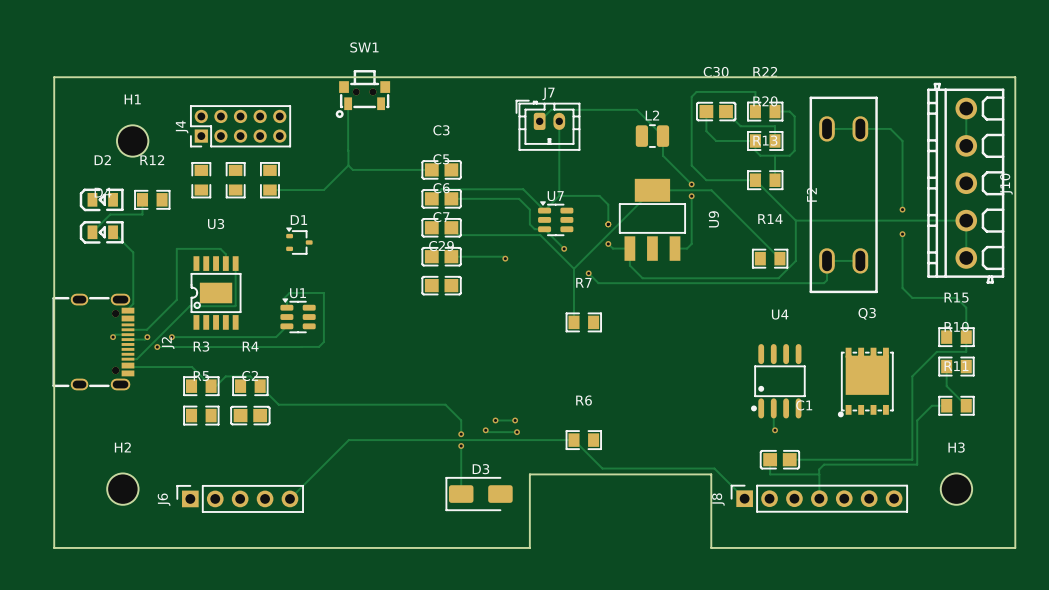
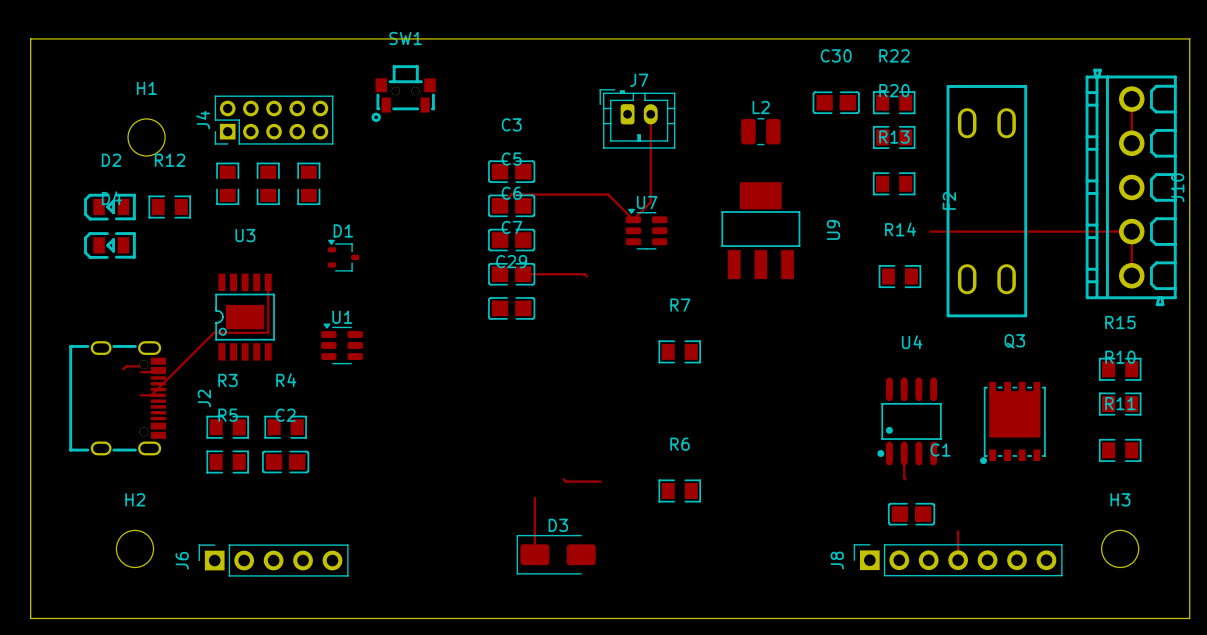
board edge: (1015, 77) (54, 77) (54, 547) -> (1189, 62) (1189, 38) (30, 38) (30, 618) (53, 618)
SW1 position: (362, 94) -> (403, 93)
track: (348, 103) (348, 165) -> none
track: (706, 111) (706, 131) (716, 140) (755, 140) (755, 150) (760, 155) (789, 155) (794, 150) (794, 116) (789, 111) (775, 111) -> none
track: (726, 111) (740, 126) (775, 126) (775, 140) -> none
track: (755, 111) (755, 91) (696, 91) (691, 96) (691, 165) (706, 180) (755, 180) (795, 220) (795, 260) (778, 278) (642, 278) (629, 265) (629, 248) (612, 248) (608, 243) -> none
track: (539, 121) (551, 109) (636, 109) (662, 136) (662, 155) (691, 184) -> none
track: (827, 128) (890, 128) (902, 140) (902, 209) -> none
track: (775, 155) (775, 180) -> none
track: (348, 165) (352, 169) (431, 169) -> none
track: (348, 165) (323, 190) (269, 190) -> none
via: (691, 184) -> none
track: (559, 195) (599, 195) (608, 204) (608, 224) -> none
track: (691, 196) (691, 243) (687, 248) (675, 248) -> none
via: (691, 196) -> none
track: (451, 198) (519, 198) (529, 209) (529, 224) (534, 229) (544, 229) (564, 248) -> none
track: (142, 199) (142, 214) (110, 214) (92, 232) -> none
via: (902, 209) -> none
via: (608, 224) -> none
track: (451, 227) (458, 235) (540, 235) (573, 268) -> none
track: (113, 232) (133, 252) (133, 303) (127, 309) -> none
track: (902, 234) (902, 288) (912, 297) (956, 297) (966, 307) (966, 351) (936, 351) (912, 376) (912, 459) (789, 459) -> none
via: (902, 234) -> none
via: (608, 243) -> none
via: (564, 248) -> none
via: (505, 258) -> none
track: (779, 258) (711, 190) (652, 190) (573, 268) -> none
track: (860, 260) (827, 260) (827, 280) (824, 283) (598, 283) (588, 273) -> none
track: (225, 263) (225, 254) (220, 248) (176, 248) (176, 299) (146, 329) (127, 329) -> none
track: (573, 268) (573, 322) -> none
via: (588, 273) -> none
track: (286, 307) (286, 300) (284, 297) (289, 292) (323, 292) (323, 342) (319, 346) (301, 346) -> none
track: (286, 326) (276, 337) (171, 337) -> none
via: (113, 337) -> none
via: (147, 337) -> none
via: (171, 337) -> none
J2 position: (93, 342) -> (117, 398)
track: (157, 347) (301, 347) -> none
via: (157, 347) -> none
track: (946, 366) (946, 386) (966, 405) -> none
track: (127, 367) (192, 367) (211, 386) (216, 386) (225, 376) (250, 376) (278, 404) (445, 404) (461, 420) (461, 434) -> none
track: (946, 405) (931, 405) (917, 420) (917, 464) (824, 464) (819, 469) (819, 474) (770, 474) (770, 459) -> none
track: (495, 420) (515, 420) -> none
via: (495, 420) -> none
via: (515, 420) -> none
via: (485, 430) -> none
via: (775, 430) -> none
via: (517, 432) -> none
via: (461, 434) -> none
via: (461, 445) -> none
track: (744, 498) (714, 468) (602, 468) (573, 440) (348, 440) (289, 498) -> none
board edge: (529, 547) (529, 474) (711, 474) (711, 547) -> (615, 618) (830, 618)

